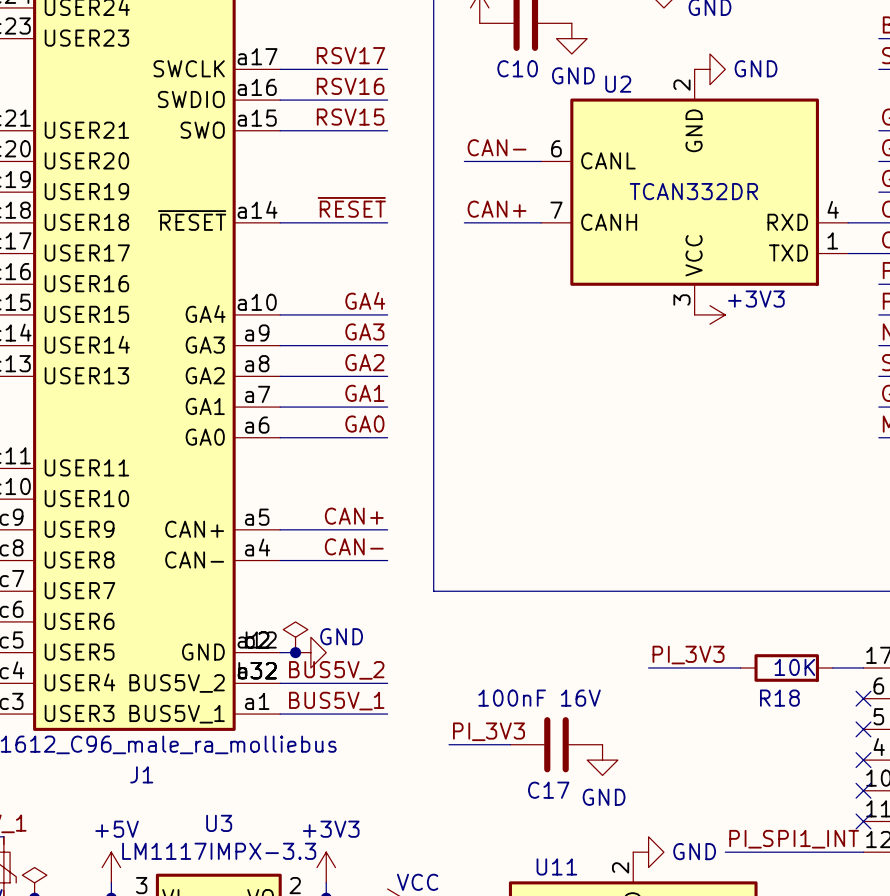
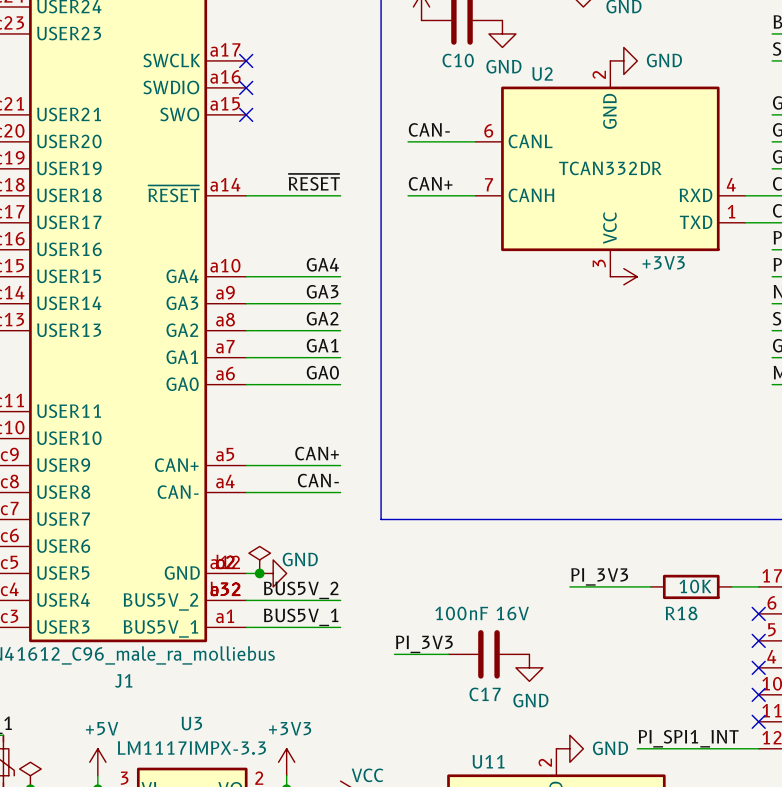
label: RSV17 (350, 55) -> none
wire: (280, 69) (387, 69) -> none
no-connect mark: none -> (246, 60)
label: RSV16 (350, 86) -> none
wire: (280, 100) (387, 100) -> none
no-connect mark: none -> (246, 87)
label: RSV15 (350, 117) -> none
wire: (280, 130) (387, 130) -> none
no-connect mark: none -> (246, 114)

